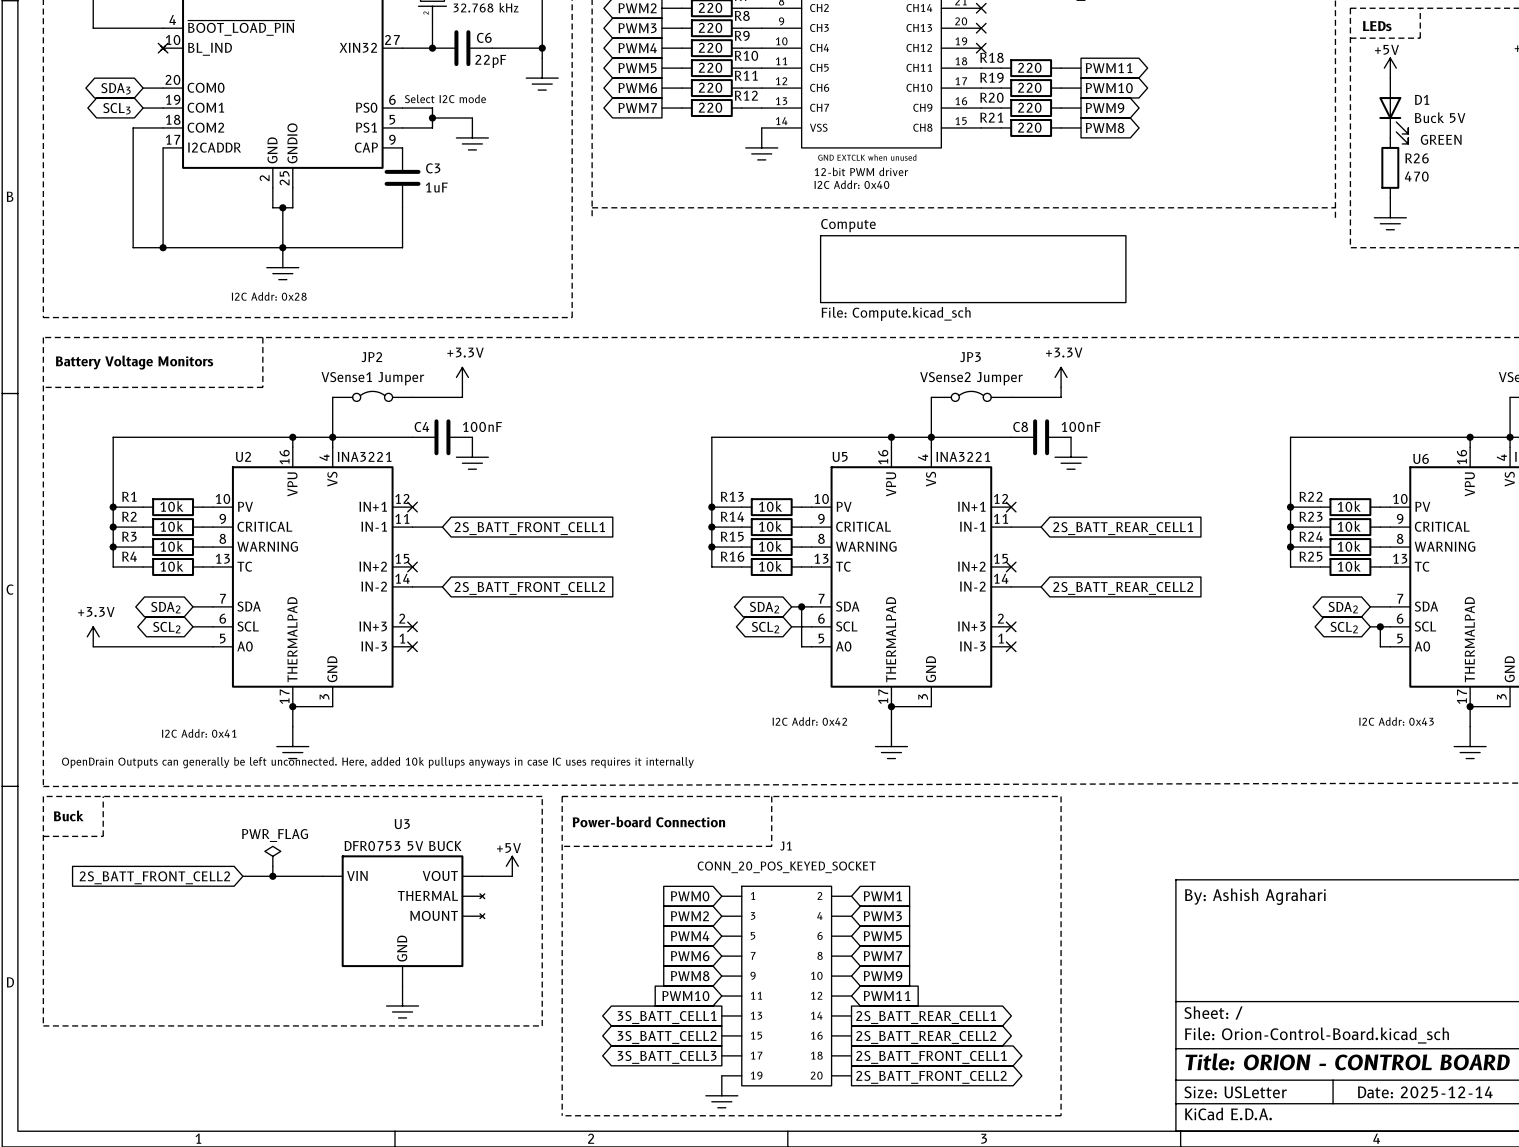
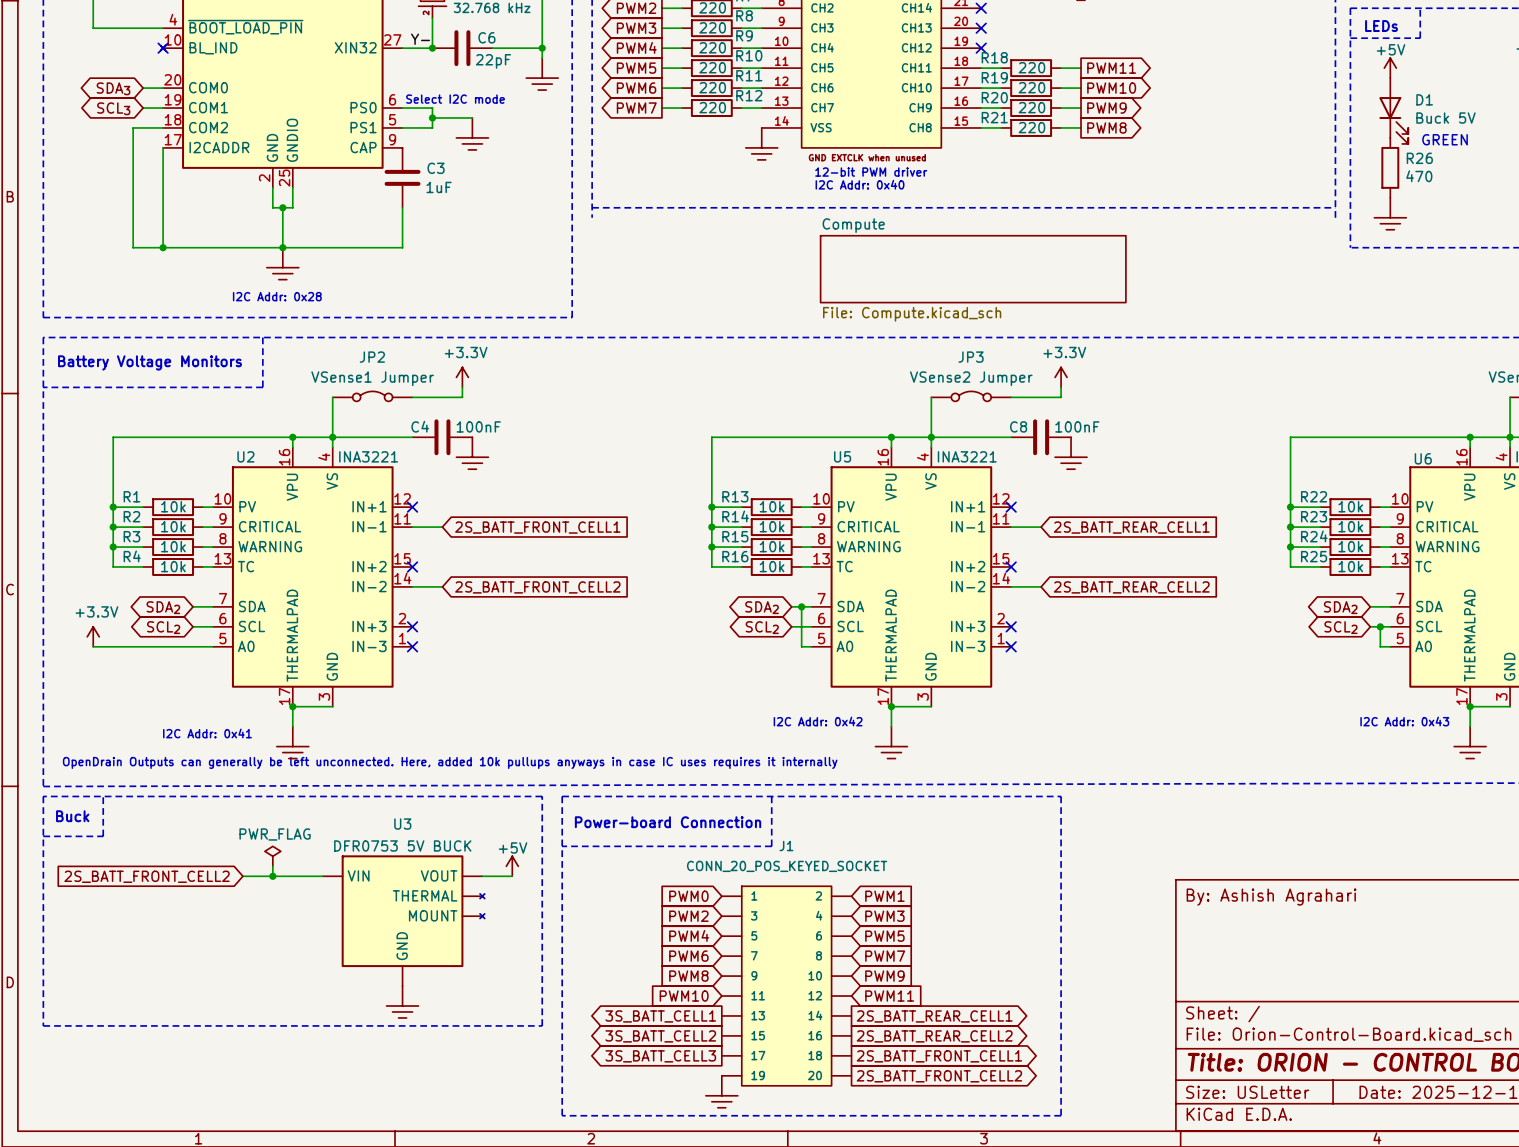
label: none -> Y- (420, 39)

